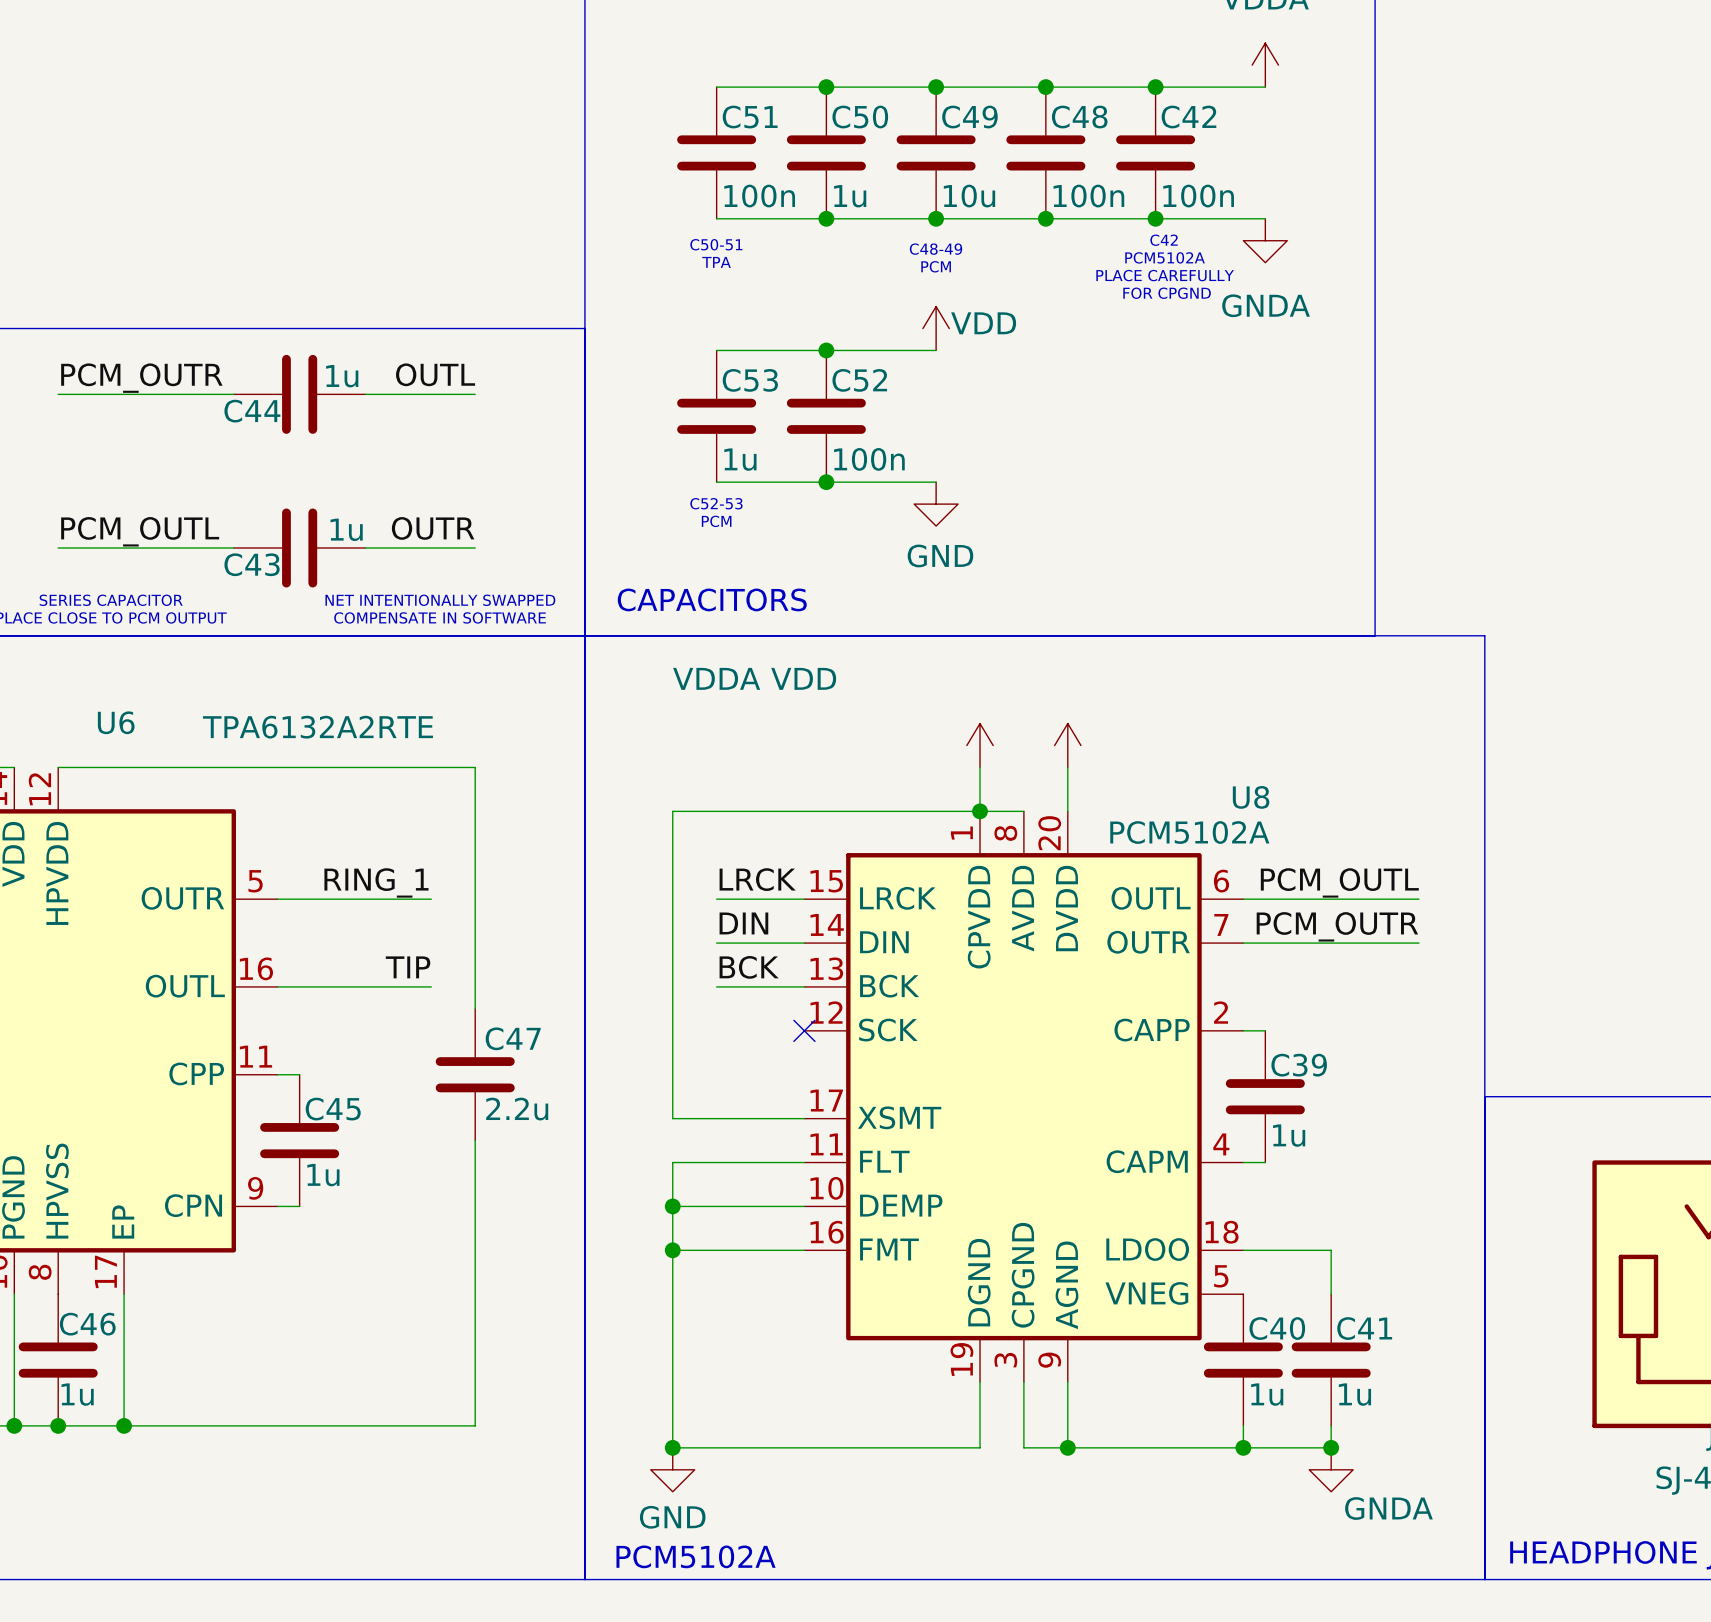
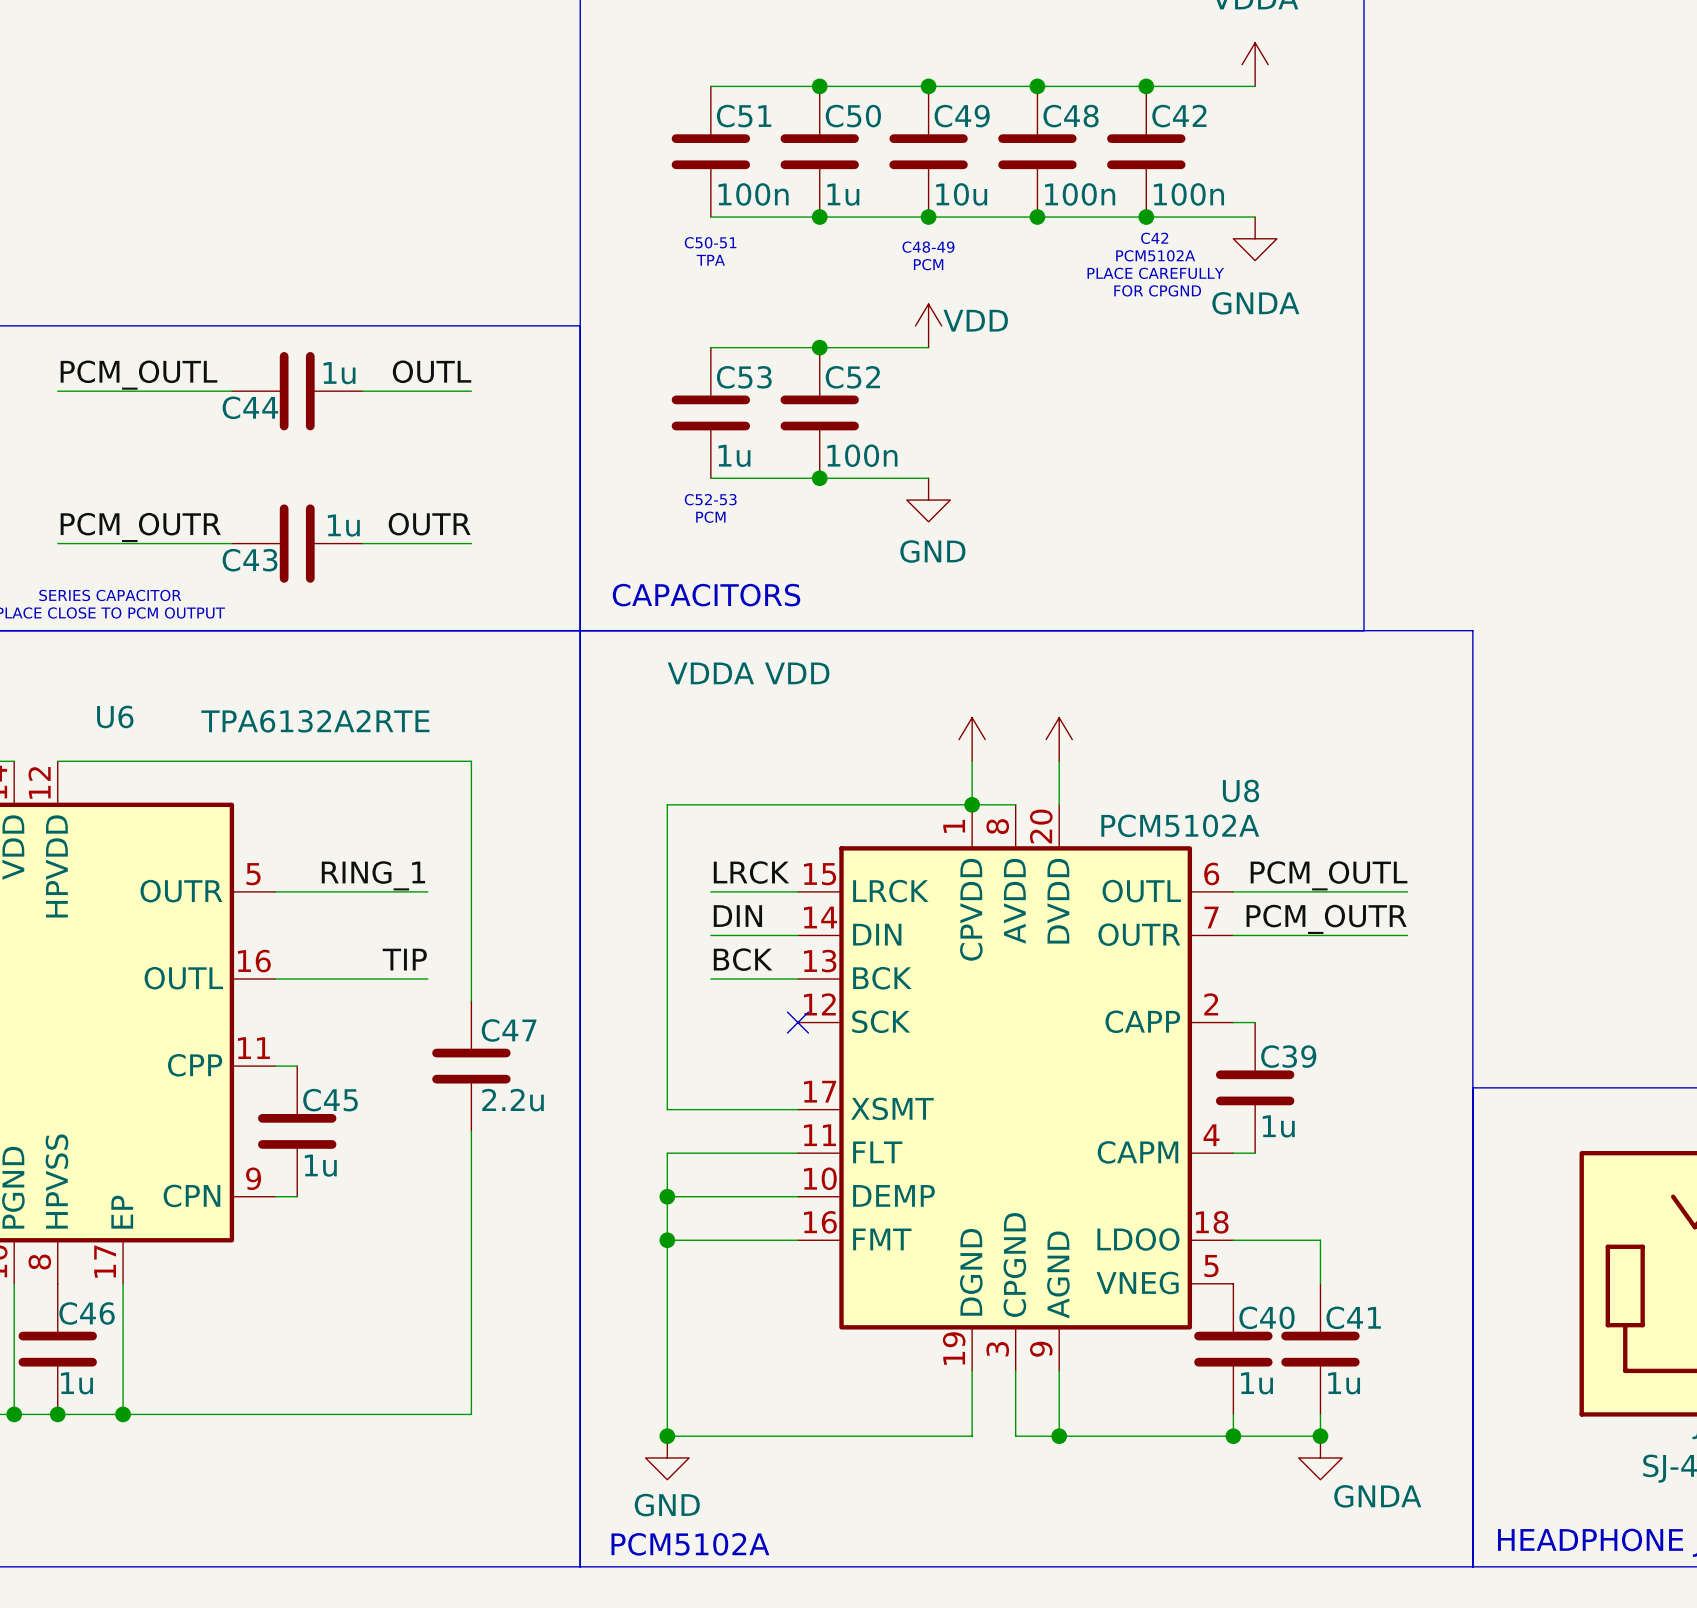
label: PCM_OUTR (141, 378) -> PCM_OUTL (139, 375)
label: PCM_OUTL (140, 531) -> PCM_OUTR (140, 527)
text: NET INTENTIONALLY SWAPPED (440, 600) -> none
text: COMPENSATE IN SOFTWARE (440, 617) -> none

